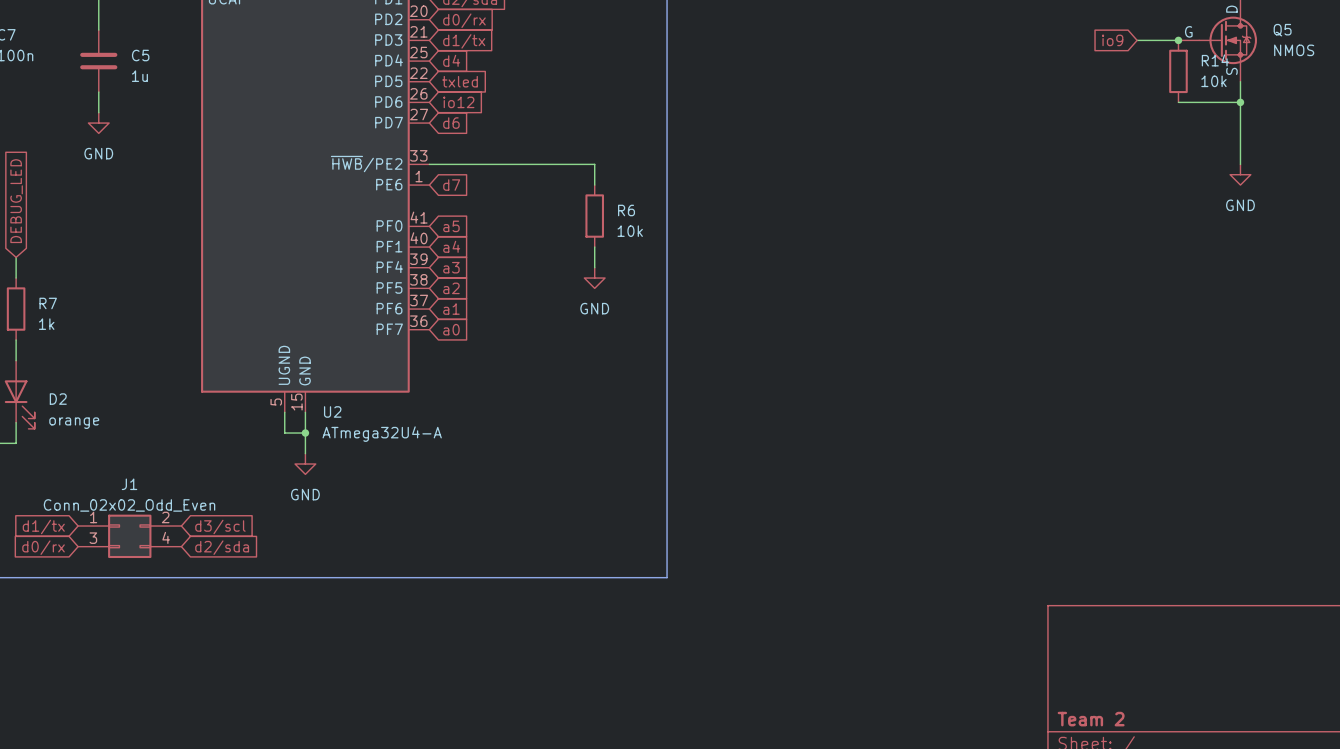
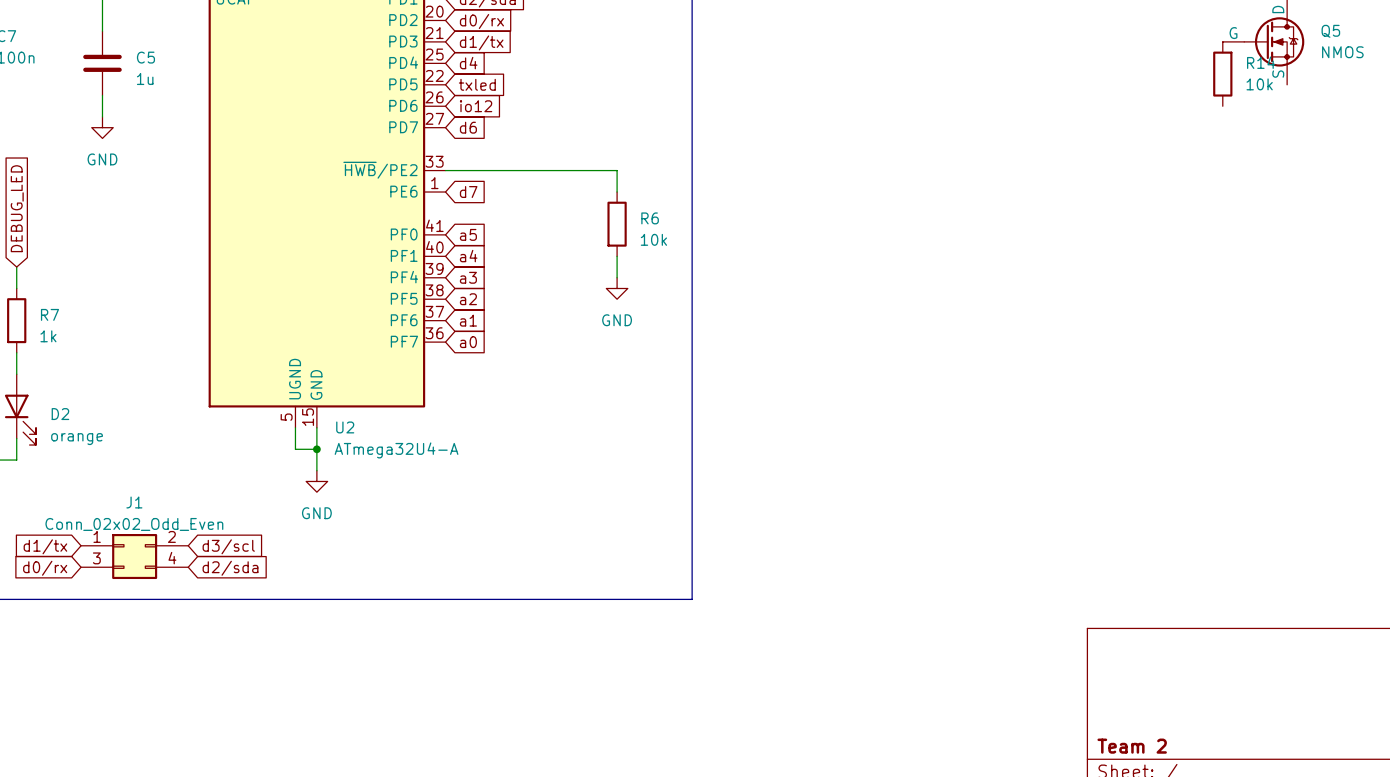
global label: io9 (1112, 40) -> none
wire: (1137, 40) (1178, 40) -> none
junction: (1178, 40) -> none
wire: (1240, 81) (1240, 164) -> none
wire: (1178, 102) (1240, 102) -> none
junction: (1240, 102) -> none
power symbol: GND (1240, 174) -> none

